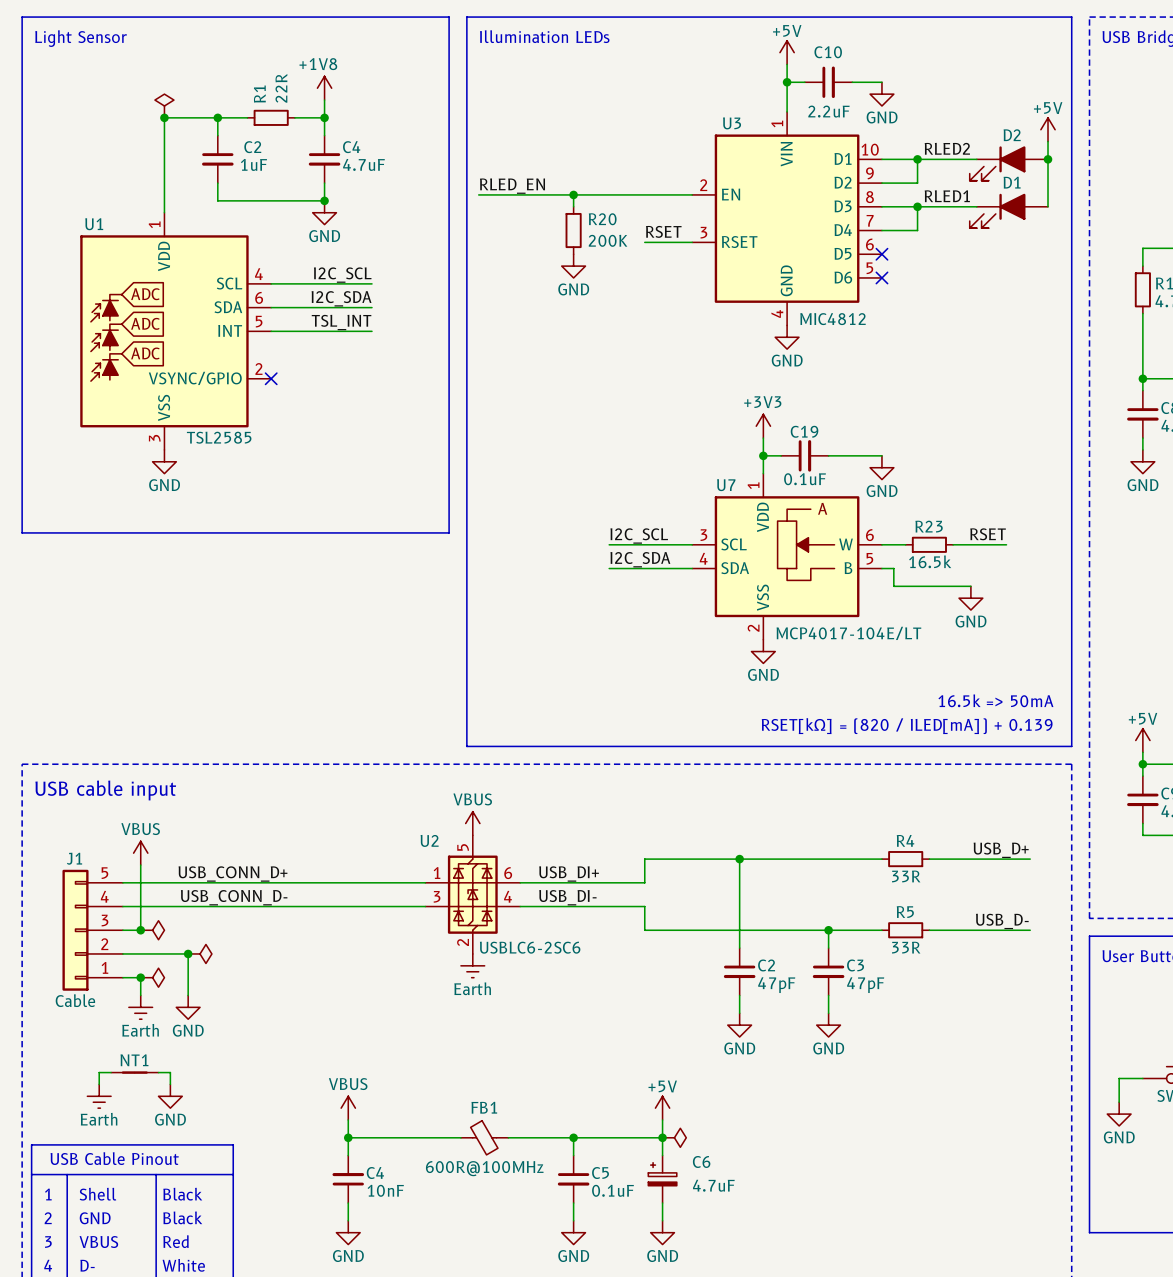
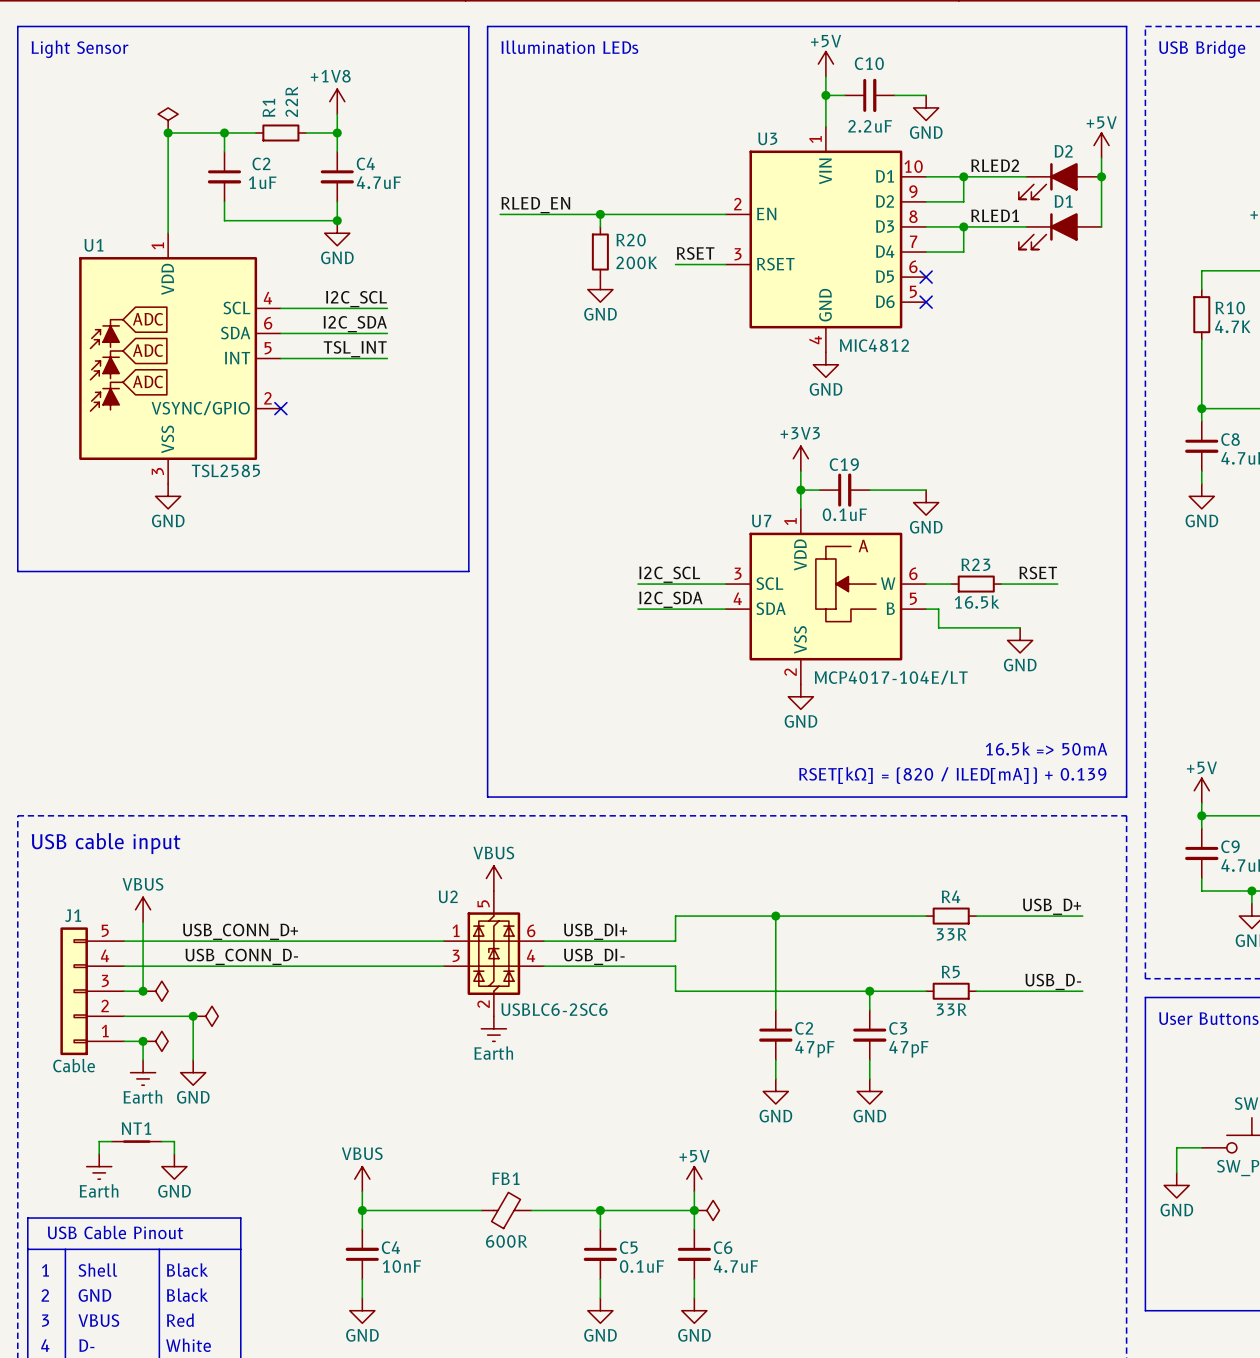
FB1 flip: as is (484, 1137) -> up-down (506, 1210)
C6 symbol: [648, 1155, 677, 1204] -> [677, 1229, 712, 1280]
FB1 value: 600R@100MHz (484, 1168) -> 600R (506, 1241)

